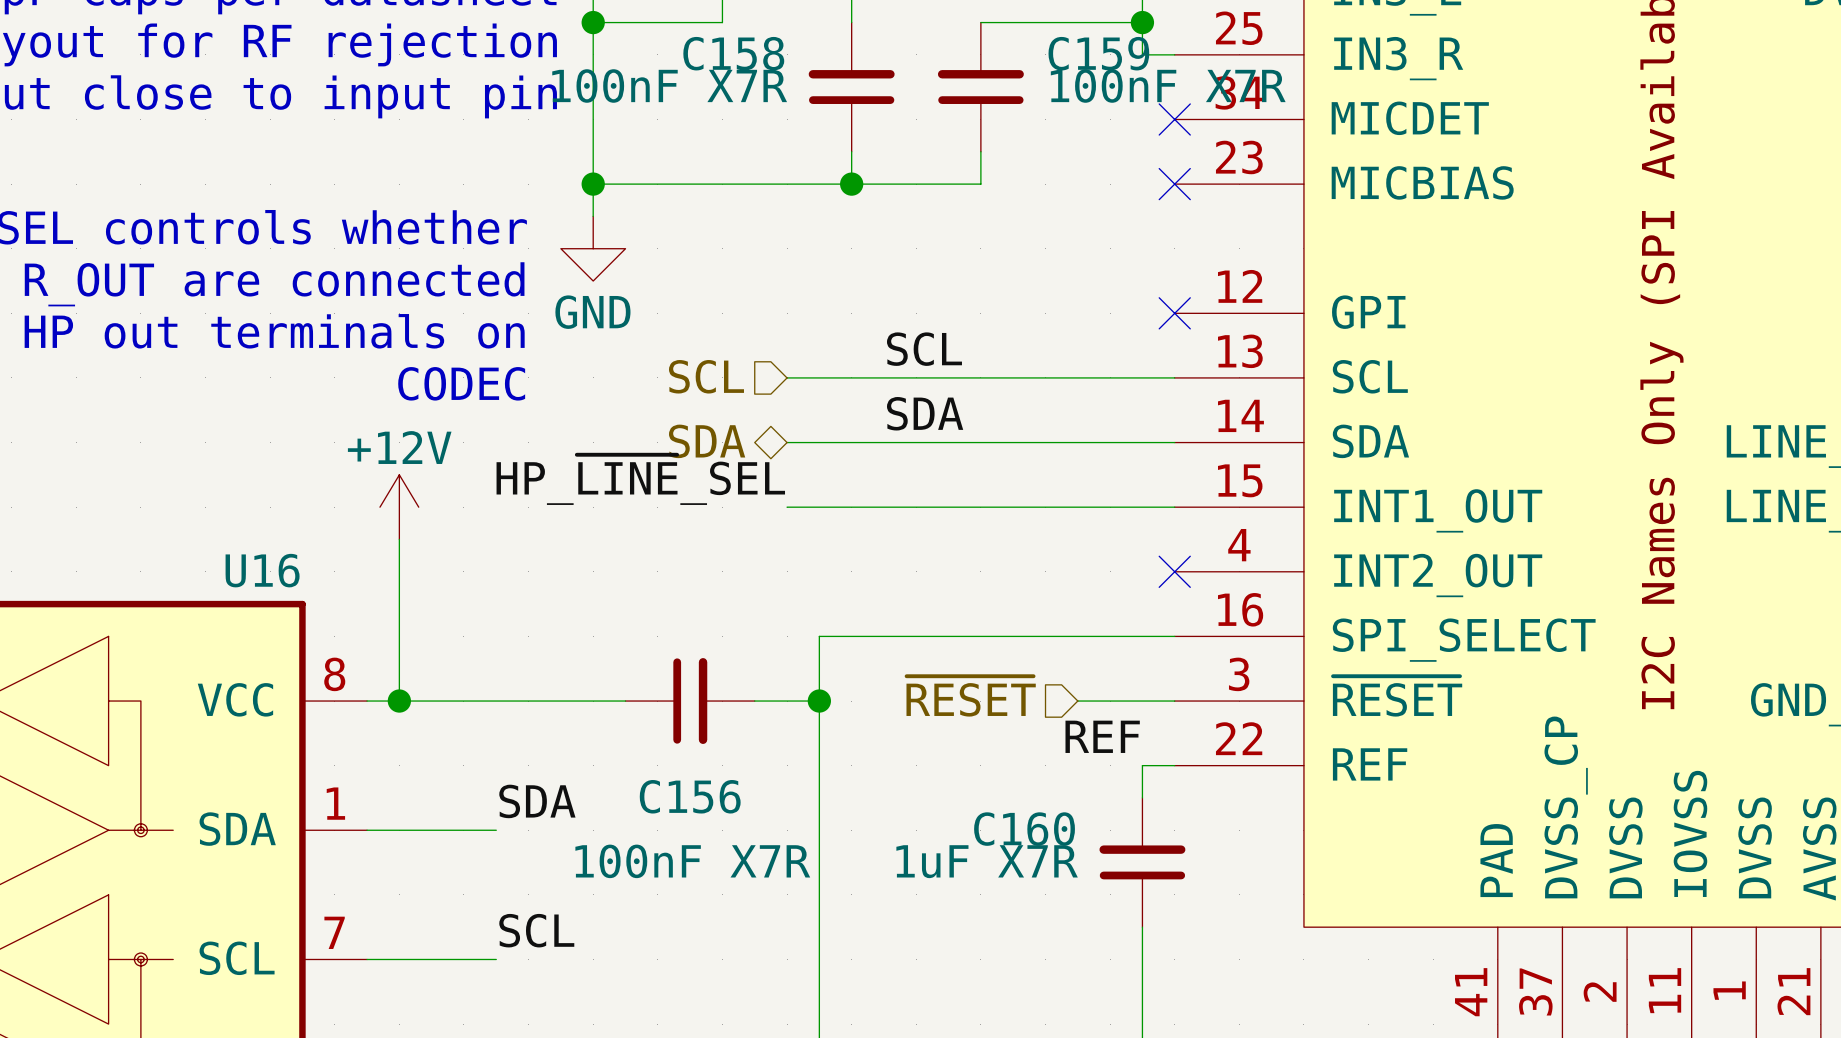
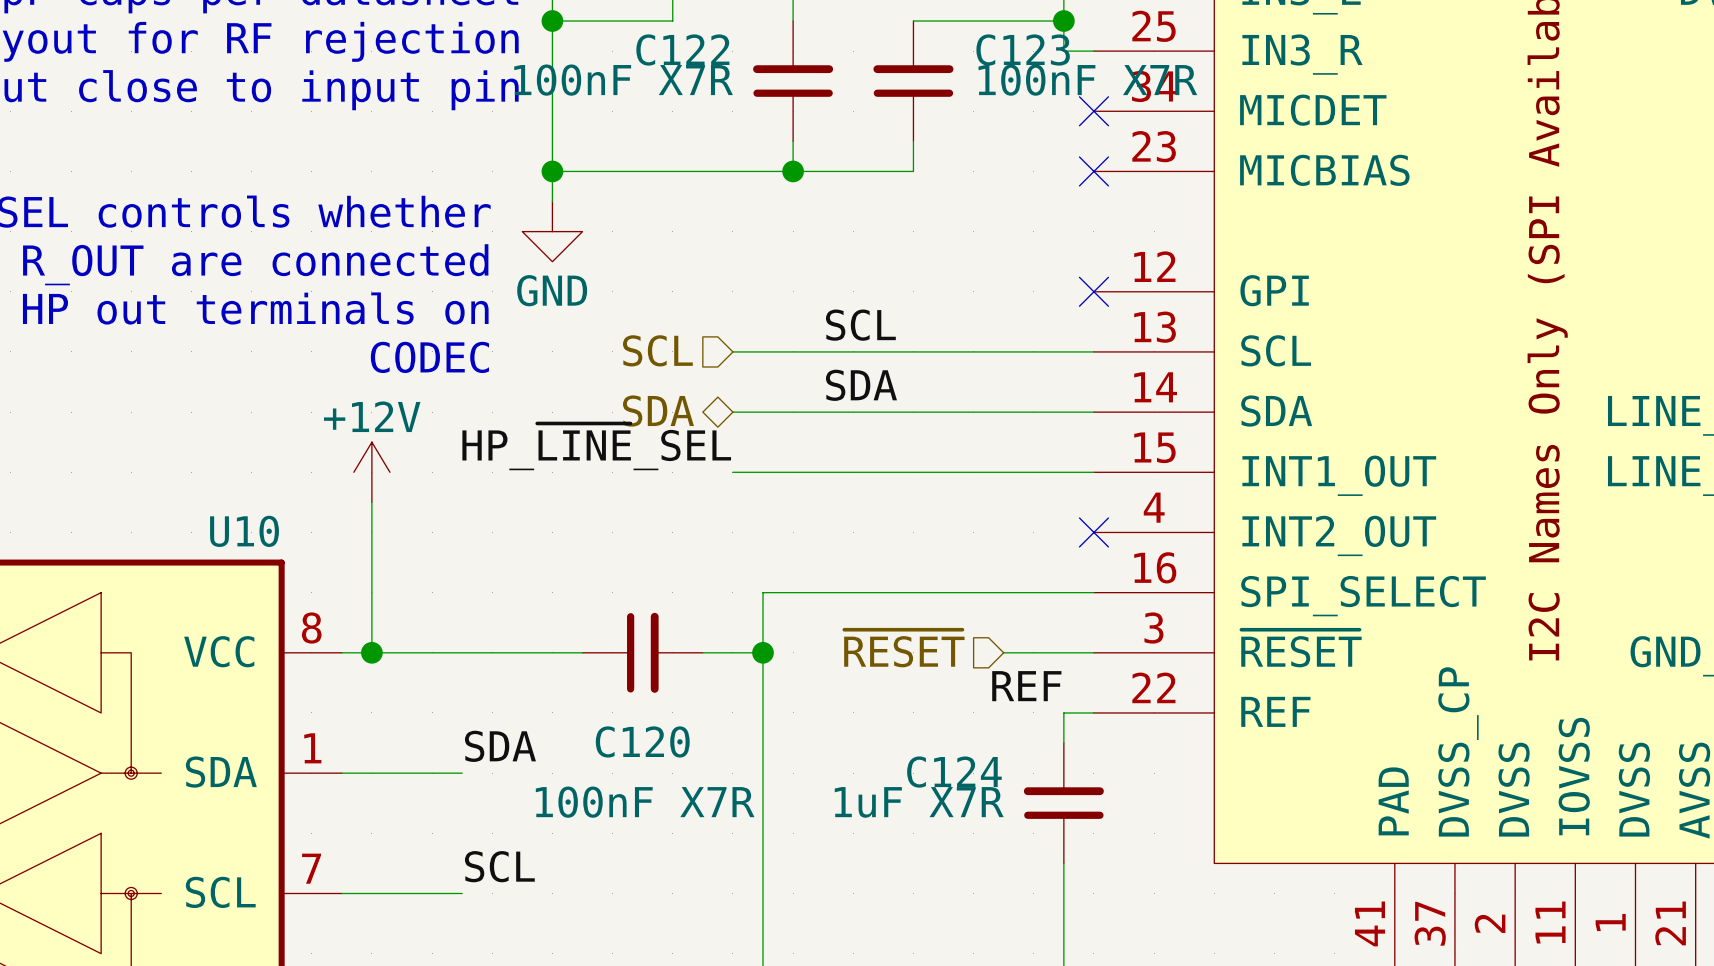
C158 name: C158 (733, 53) -> C122 (682, 50)
C159 name: C159 (1098, 53) -> C123 (1023, 50)
U16 name: U16 (262, 570) -> U10 (244, 531)
C156 name: C156 (690, 796) -> C120 (642, 741)
C160 name: C160 (1024, 829) -> C124 (954, 772)

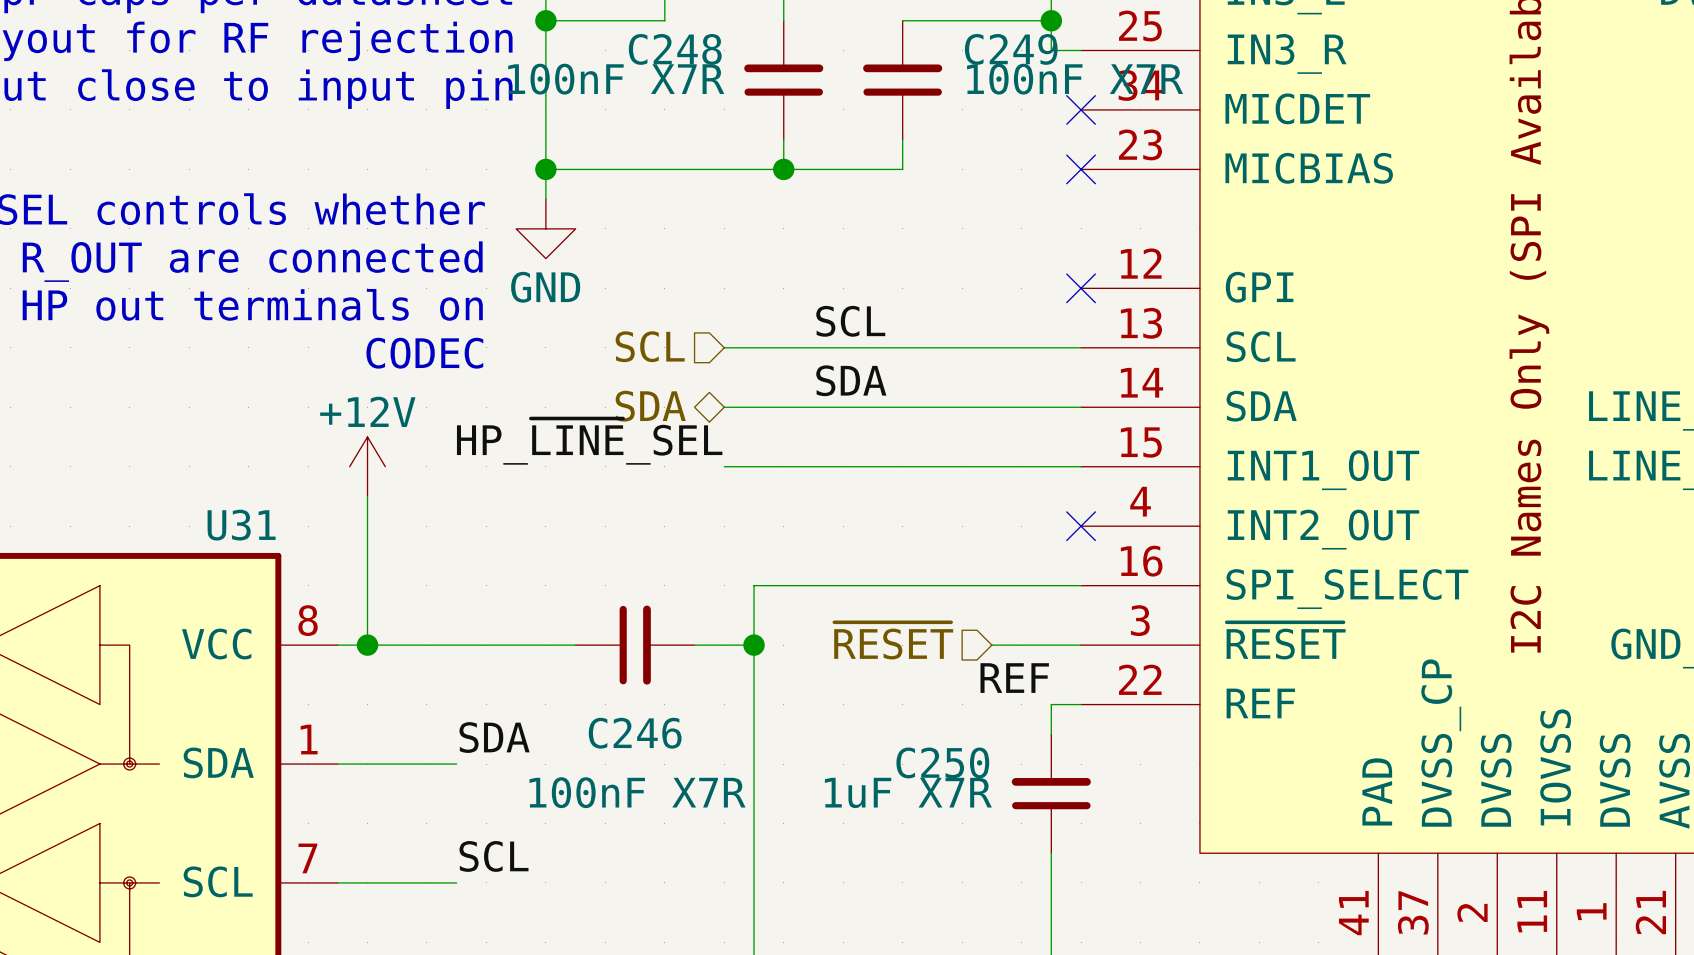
C122 name: C122 (682, 50) -> C248 (675, 49)
C123 name: C123 (1023, 50) -> C249 (1011, 49)
U10 name: U10 (244, 531) -> U31 (241, 525)
C120 name: C120 (642, 741) -> C246 (635, 733)
C124 name: C124 (954, 772) -> C250 (942, 762)

